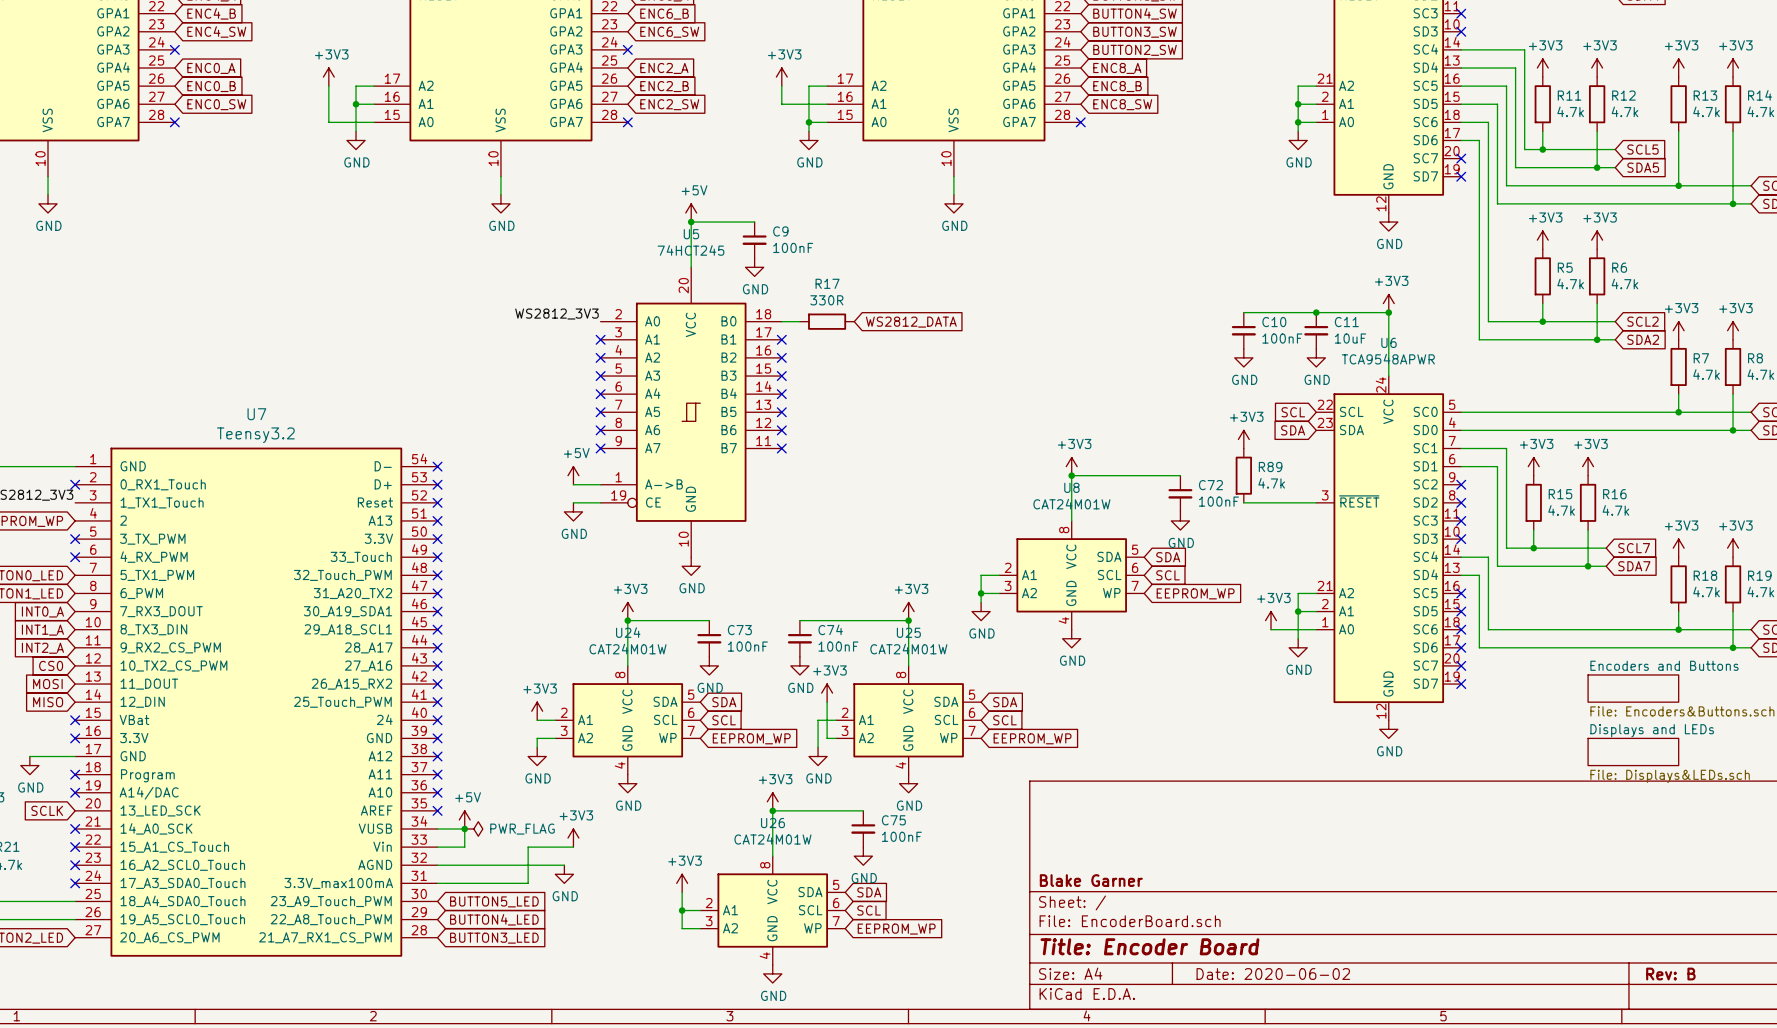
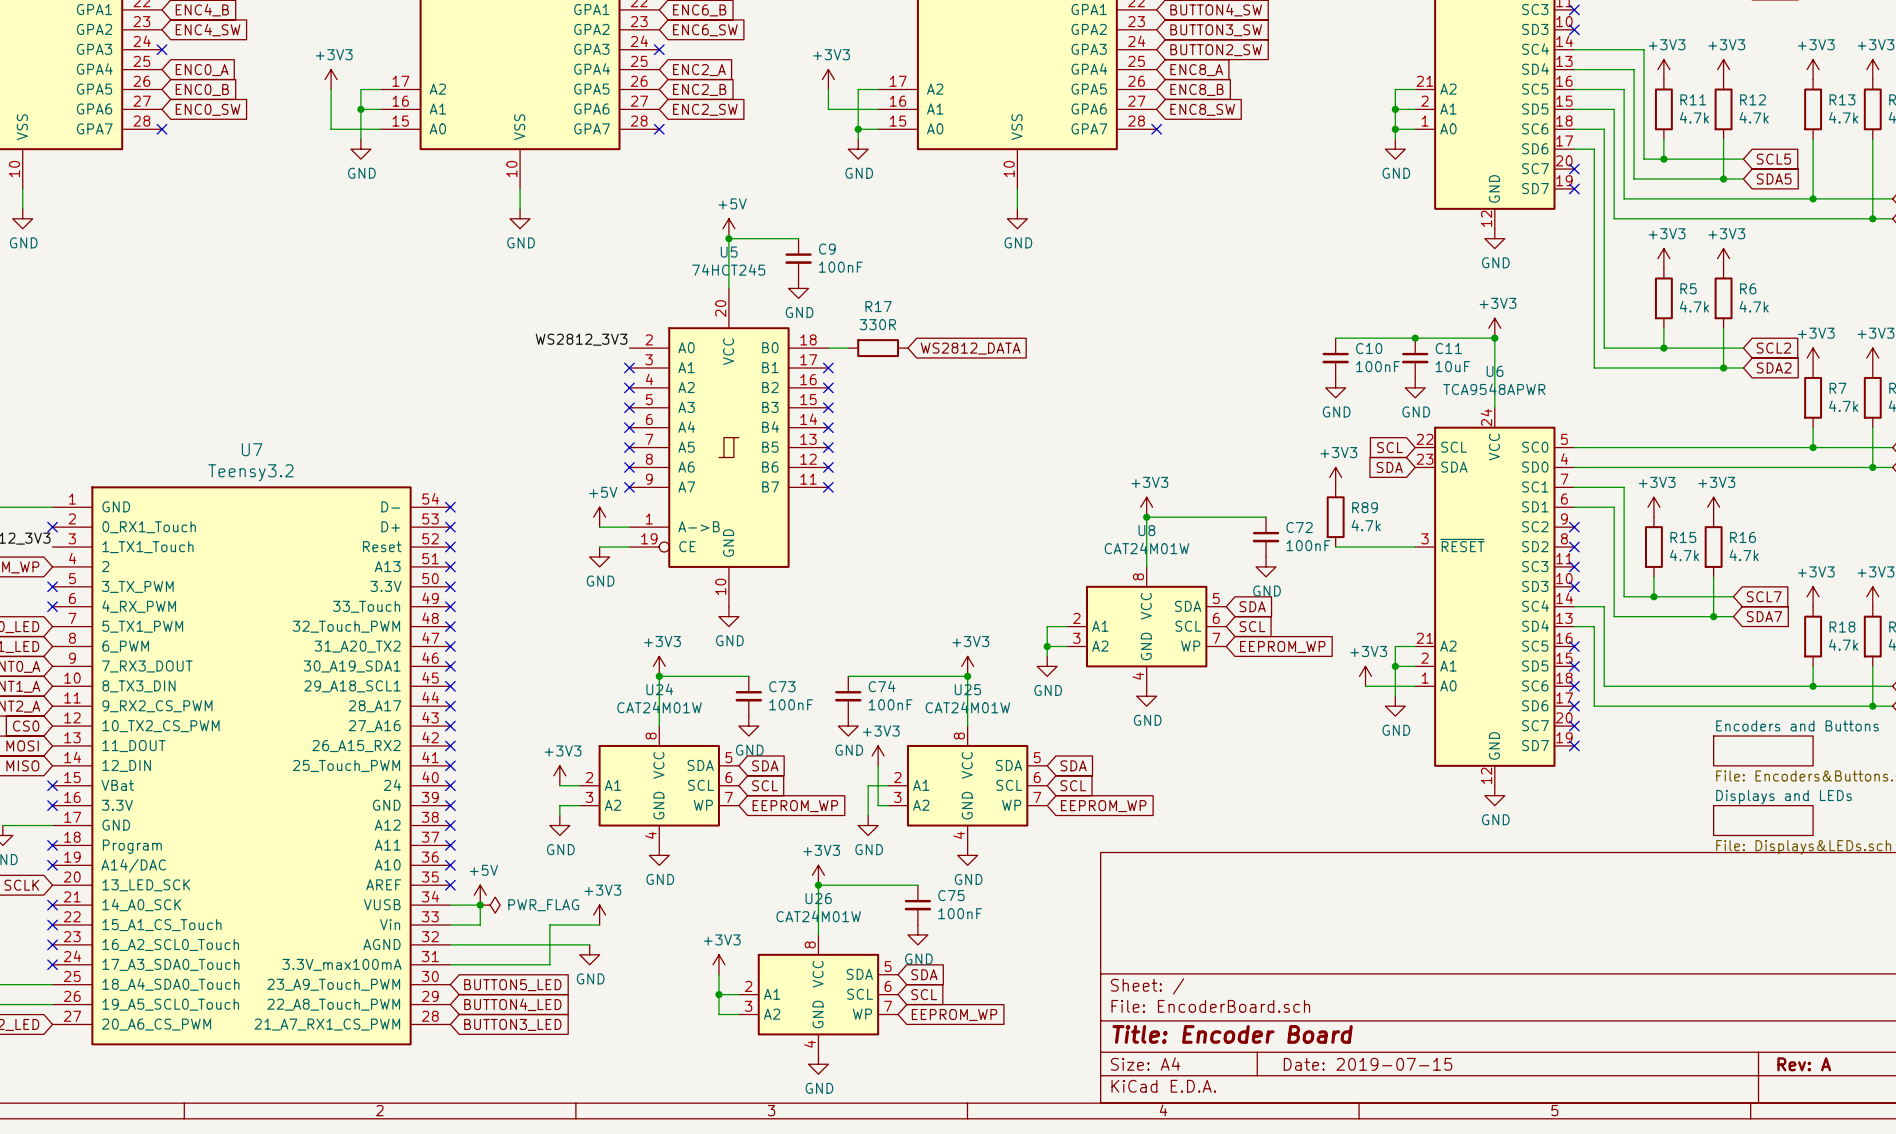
title block: Blake Garner (1091, 880) -> none
title block: Date: 2020-06-02 (1273, 974) -> Date: 2019-07-15 (1367, 1064)
title block: Rev: B (1670, 974) -> Rev: A (1804, 1064)

